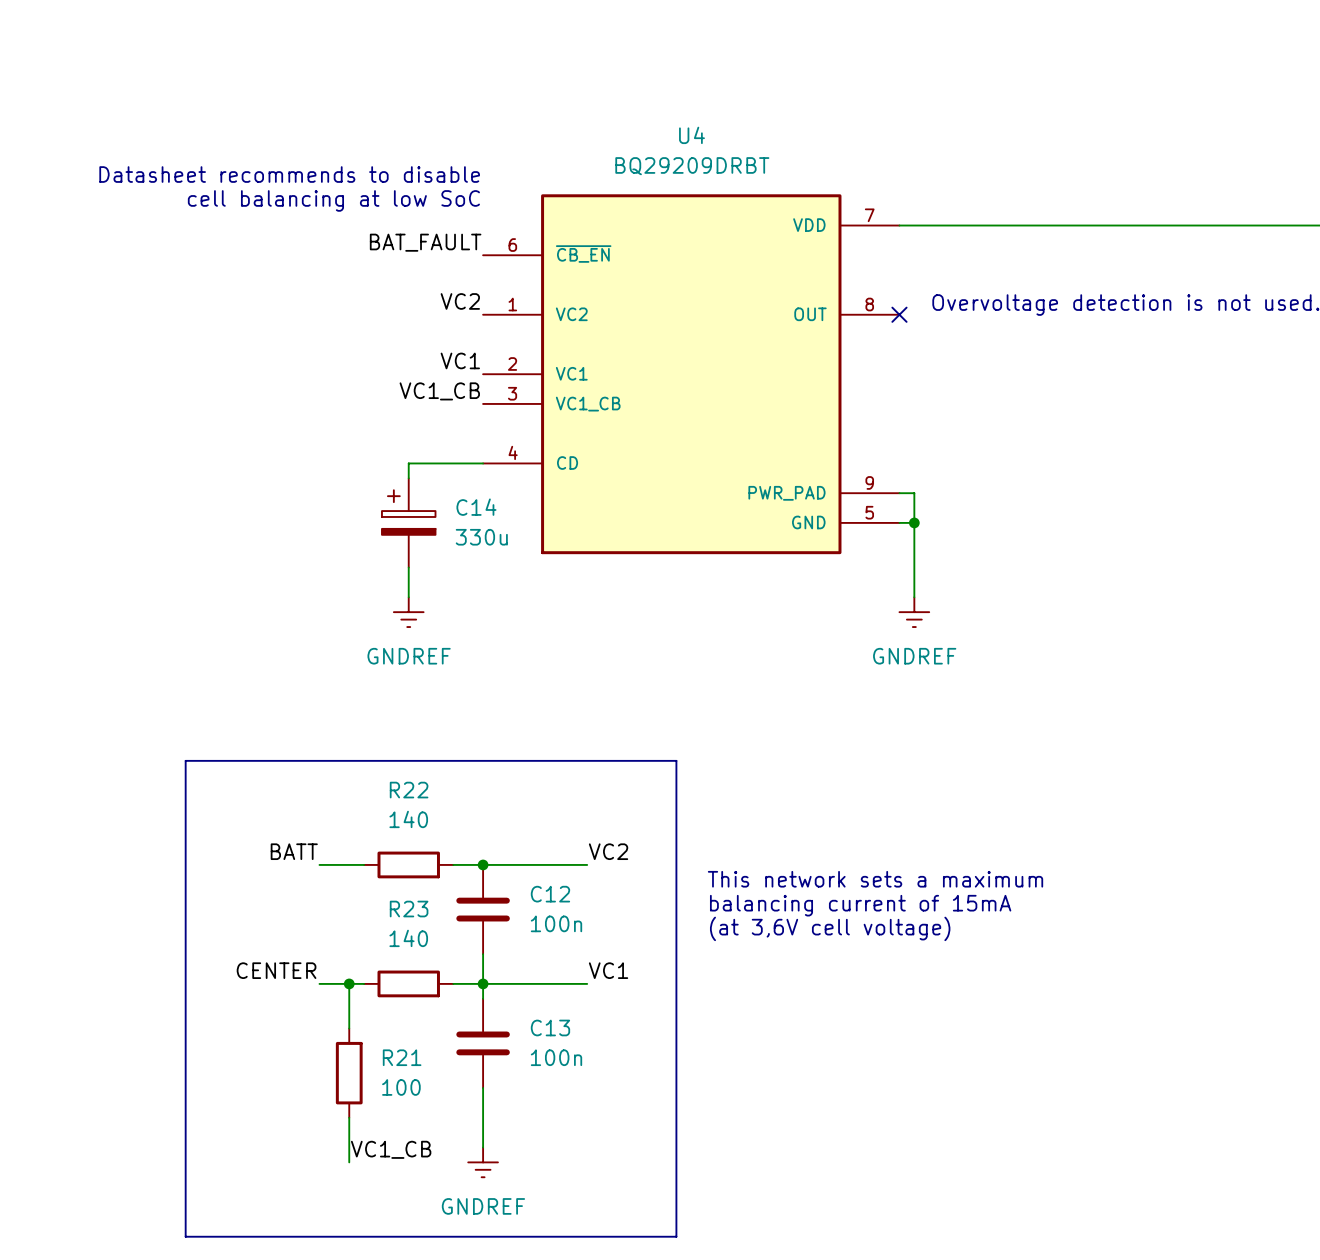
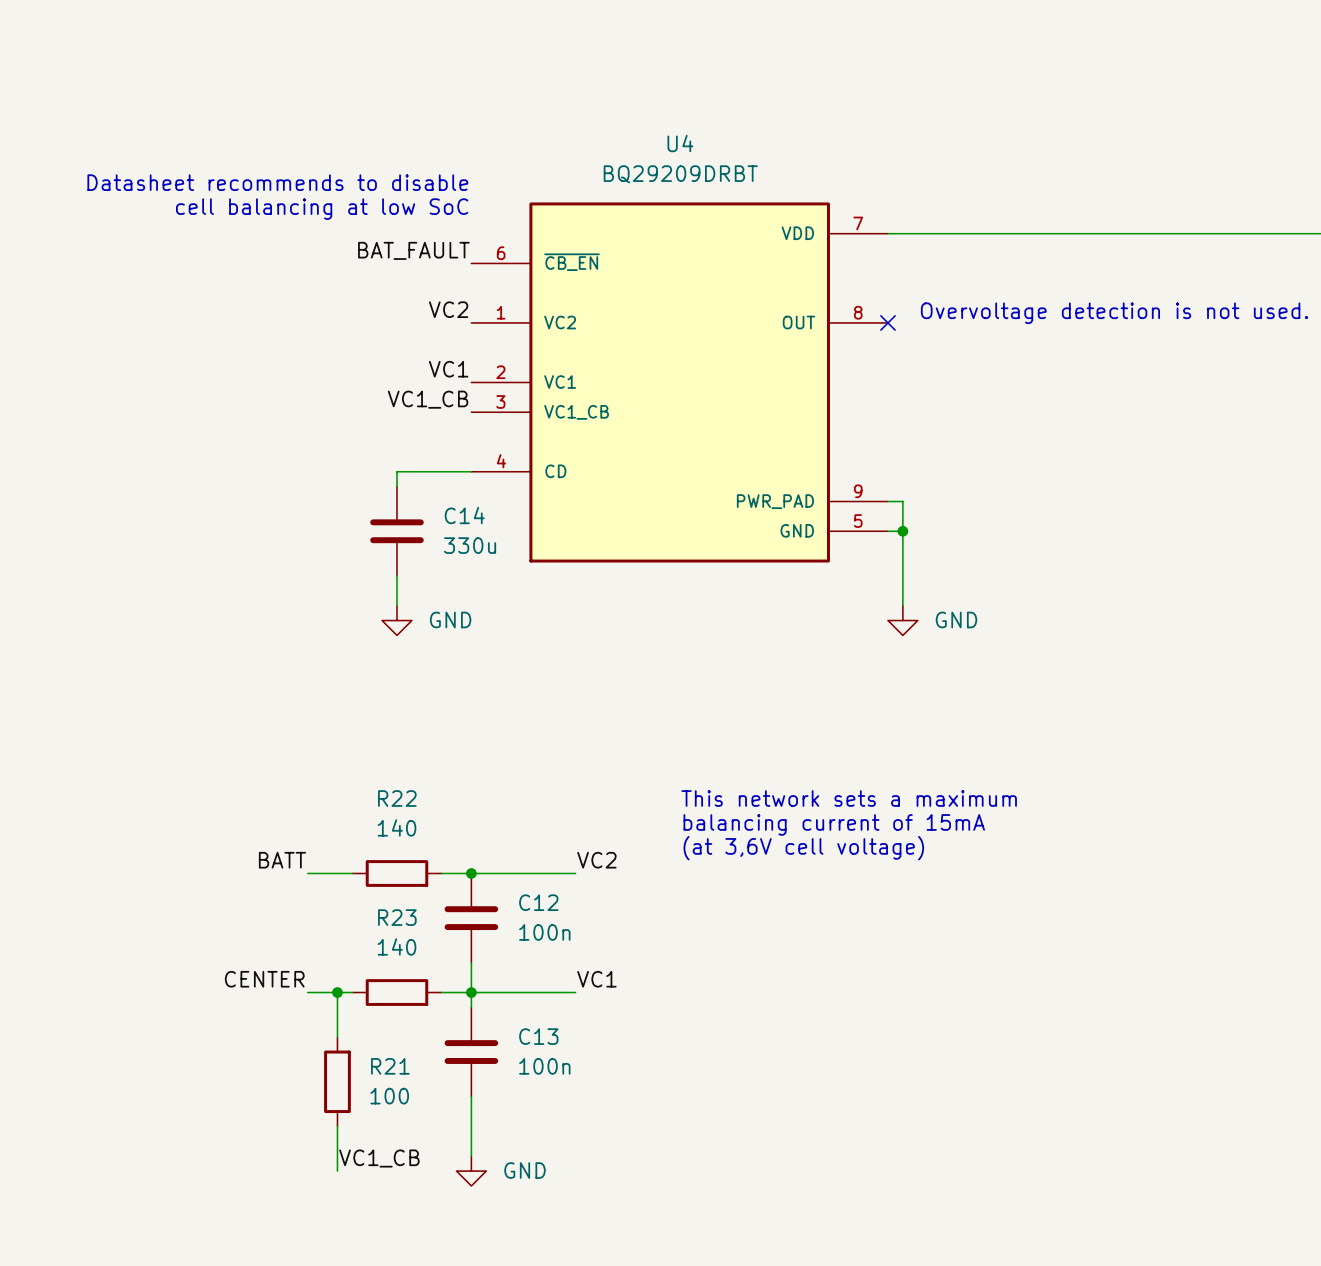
C14 symbol: [381, 478, 436, 568] -> [370, 486, 424, 576]
power symbol: GNDREF (408, 612) -> GND (396, 620)
power symbol: GNDREF (914, 612) -> GND (902, 620)
line: (185, 760) (676, 760) (676, 1236) (185, 1236) (185, 760) -> none
text position: This network sets a maximum (875, 879) -> This network sets a maximum (849, 798)
text position: balancing current of 15mA (860, 905) -> balancing current of 15mA (834, 824)
text position: (at 3,6V cell voltage) (830, 928) -> (at 3,6V cell voltage) (803, 848)
power symbol: GNDREF (483, 1162) -> GND (471, 1171)

